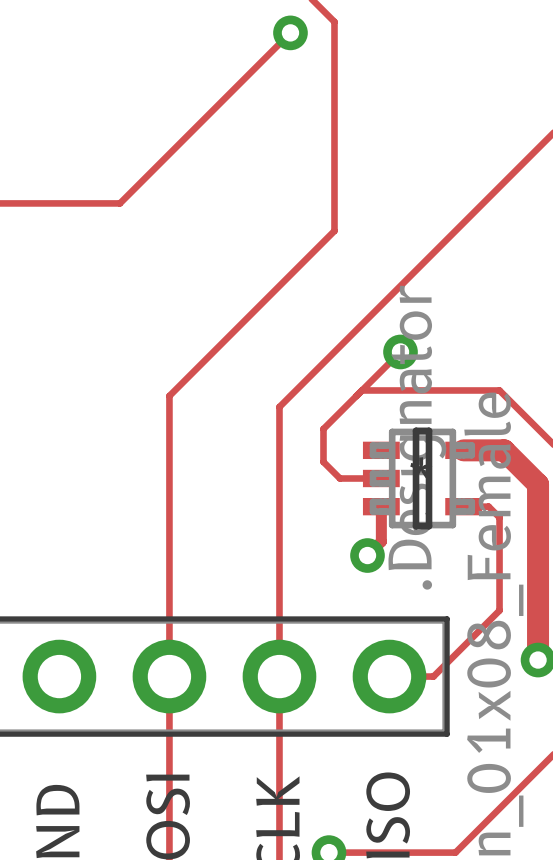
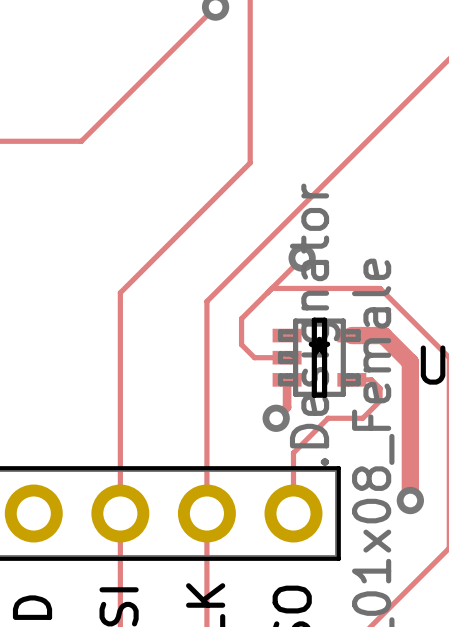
track: (499, 533) (499, 610) (433, 676) (389, 676) -> (380, 400) (362, 418) (328, 418) (293, 452) (293, 513)

